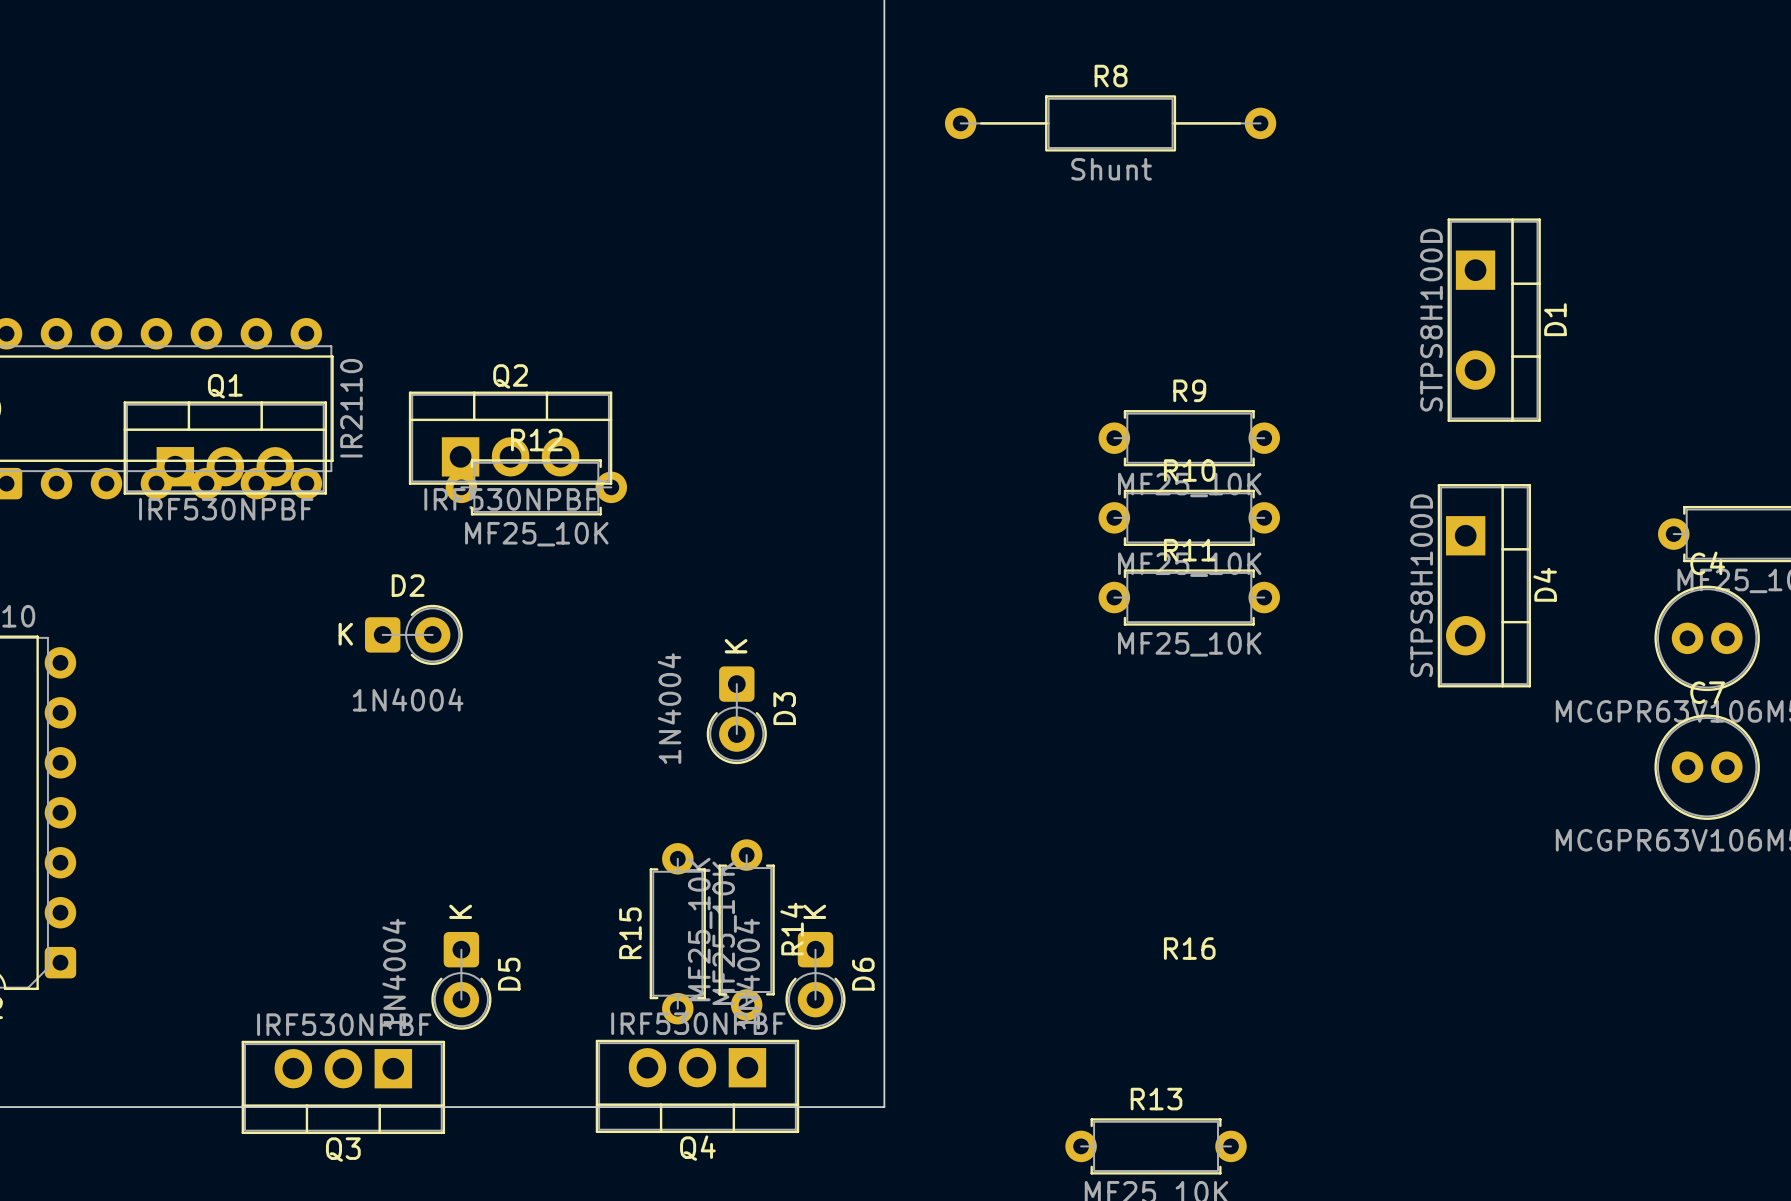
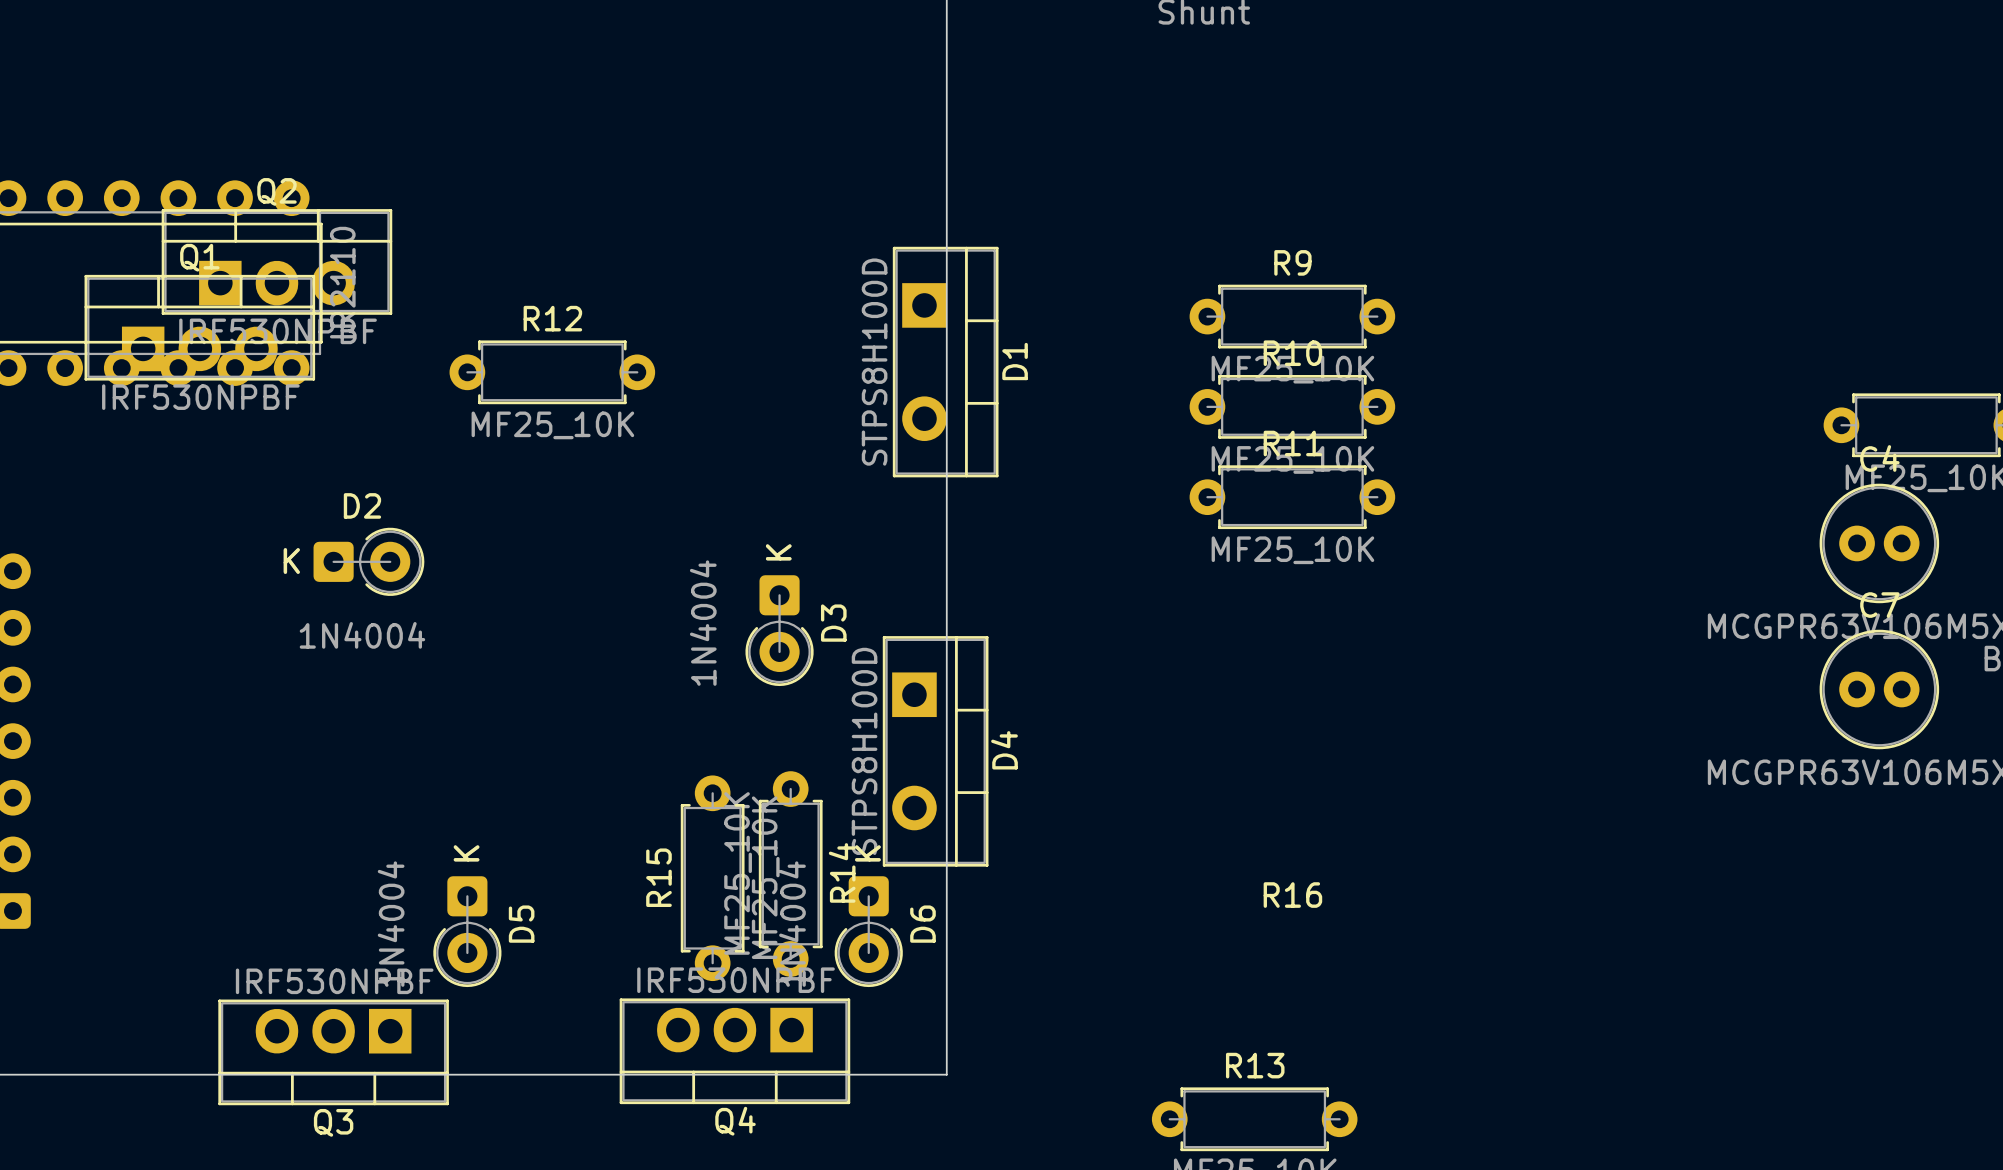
D1 position: (1494, 320) -> (945, 362)
Q2 position: (510, 438) -> (276, 261)
D4 position: (1484, 585) -> (935, 751)
D2 position: (413, 634) -> (368, 561)

